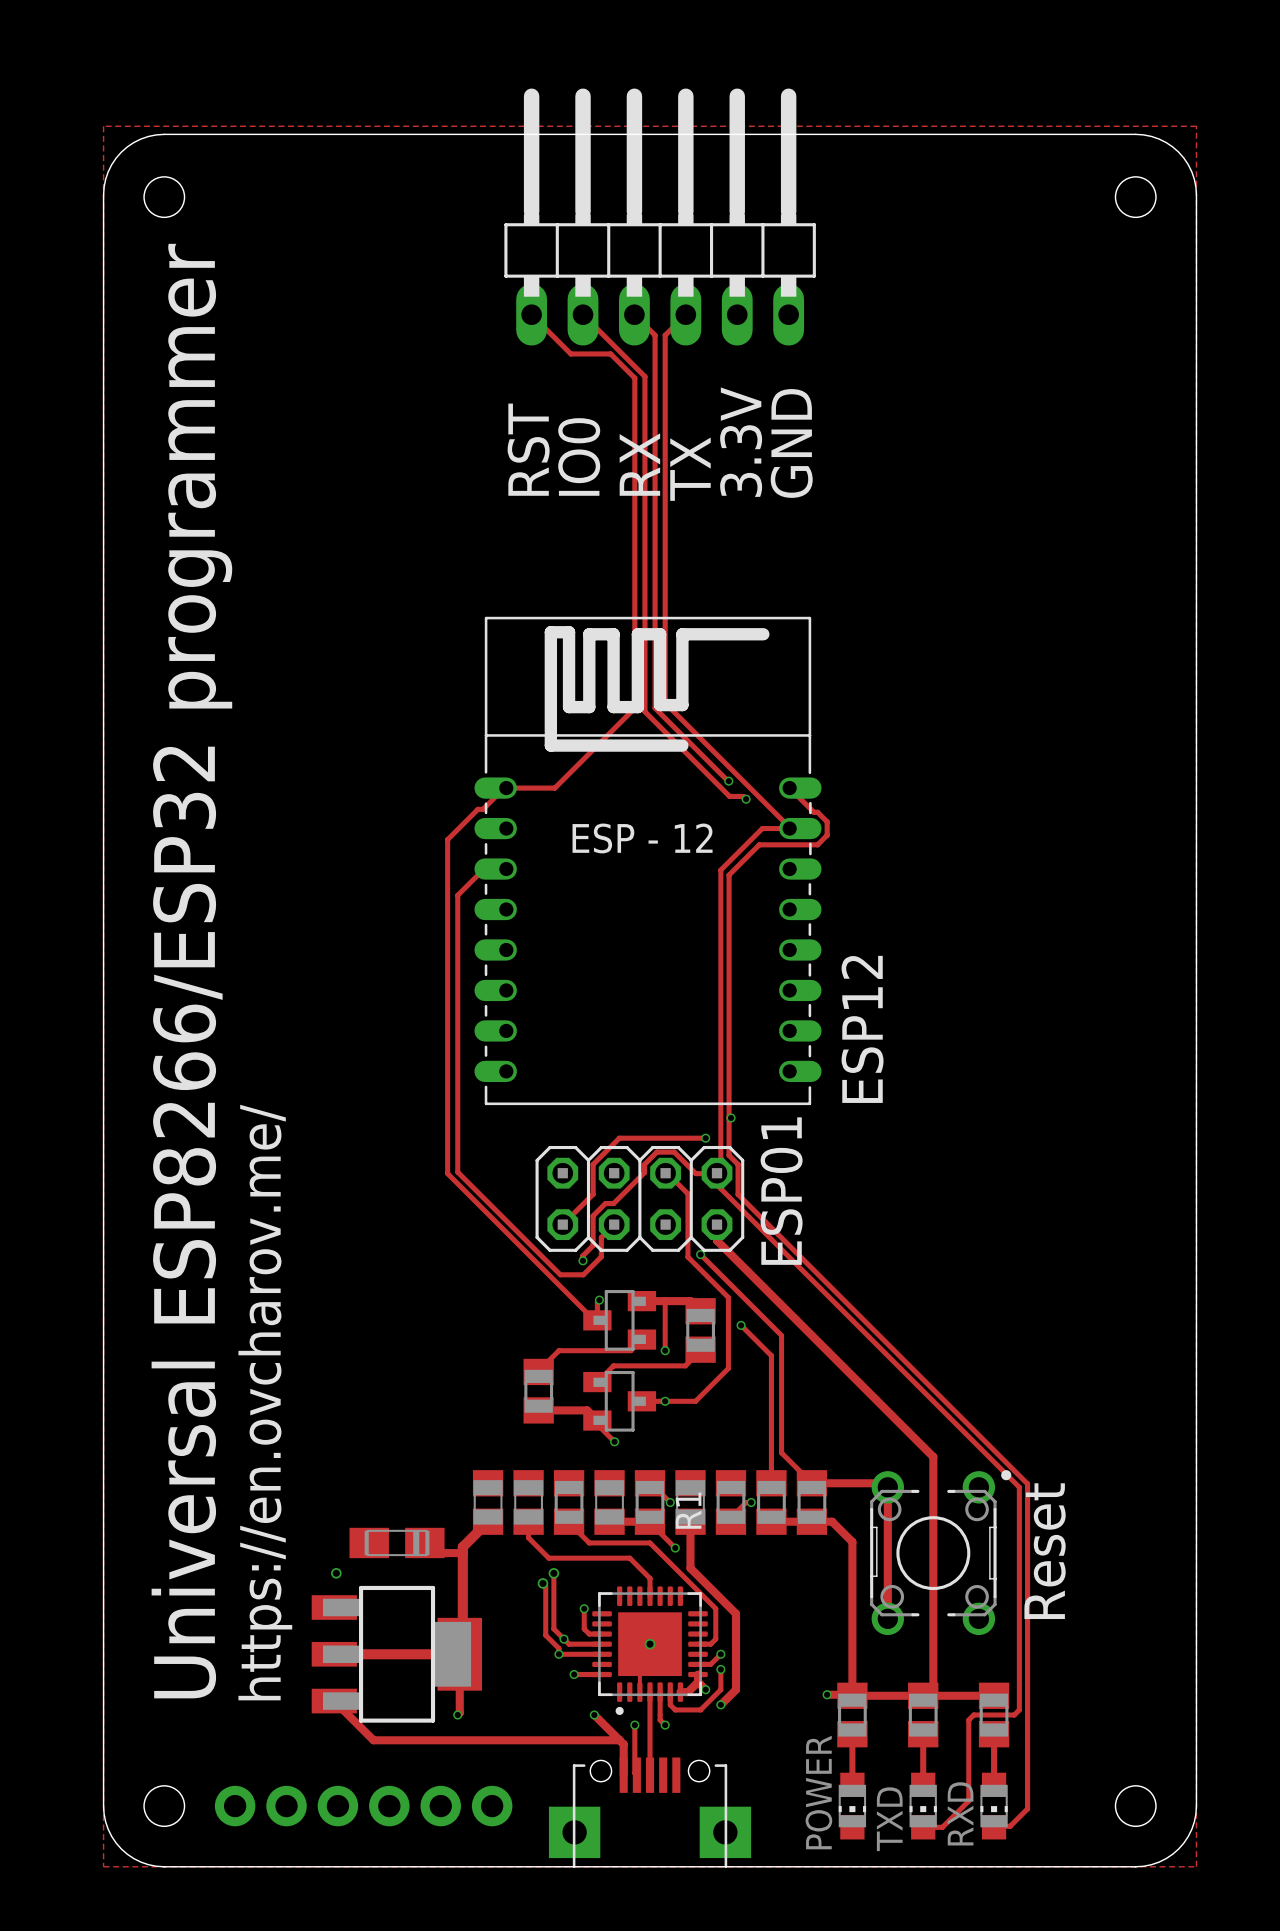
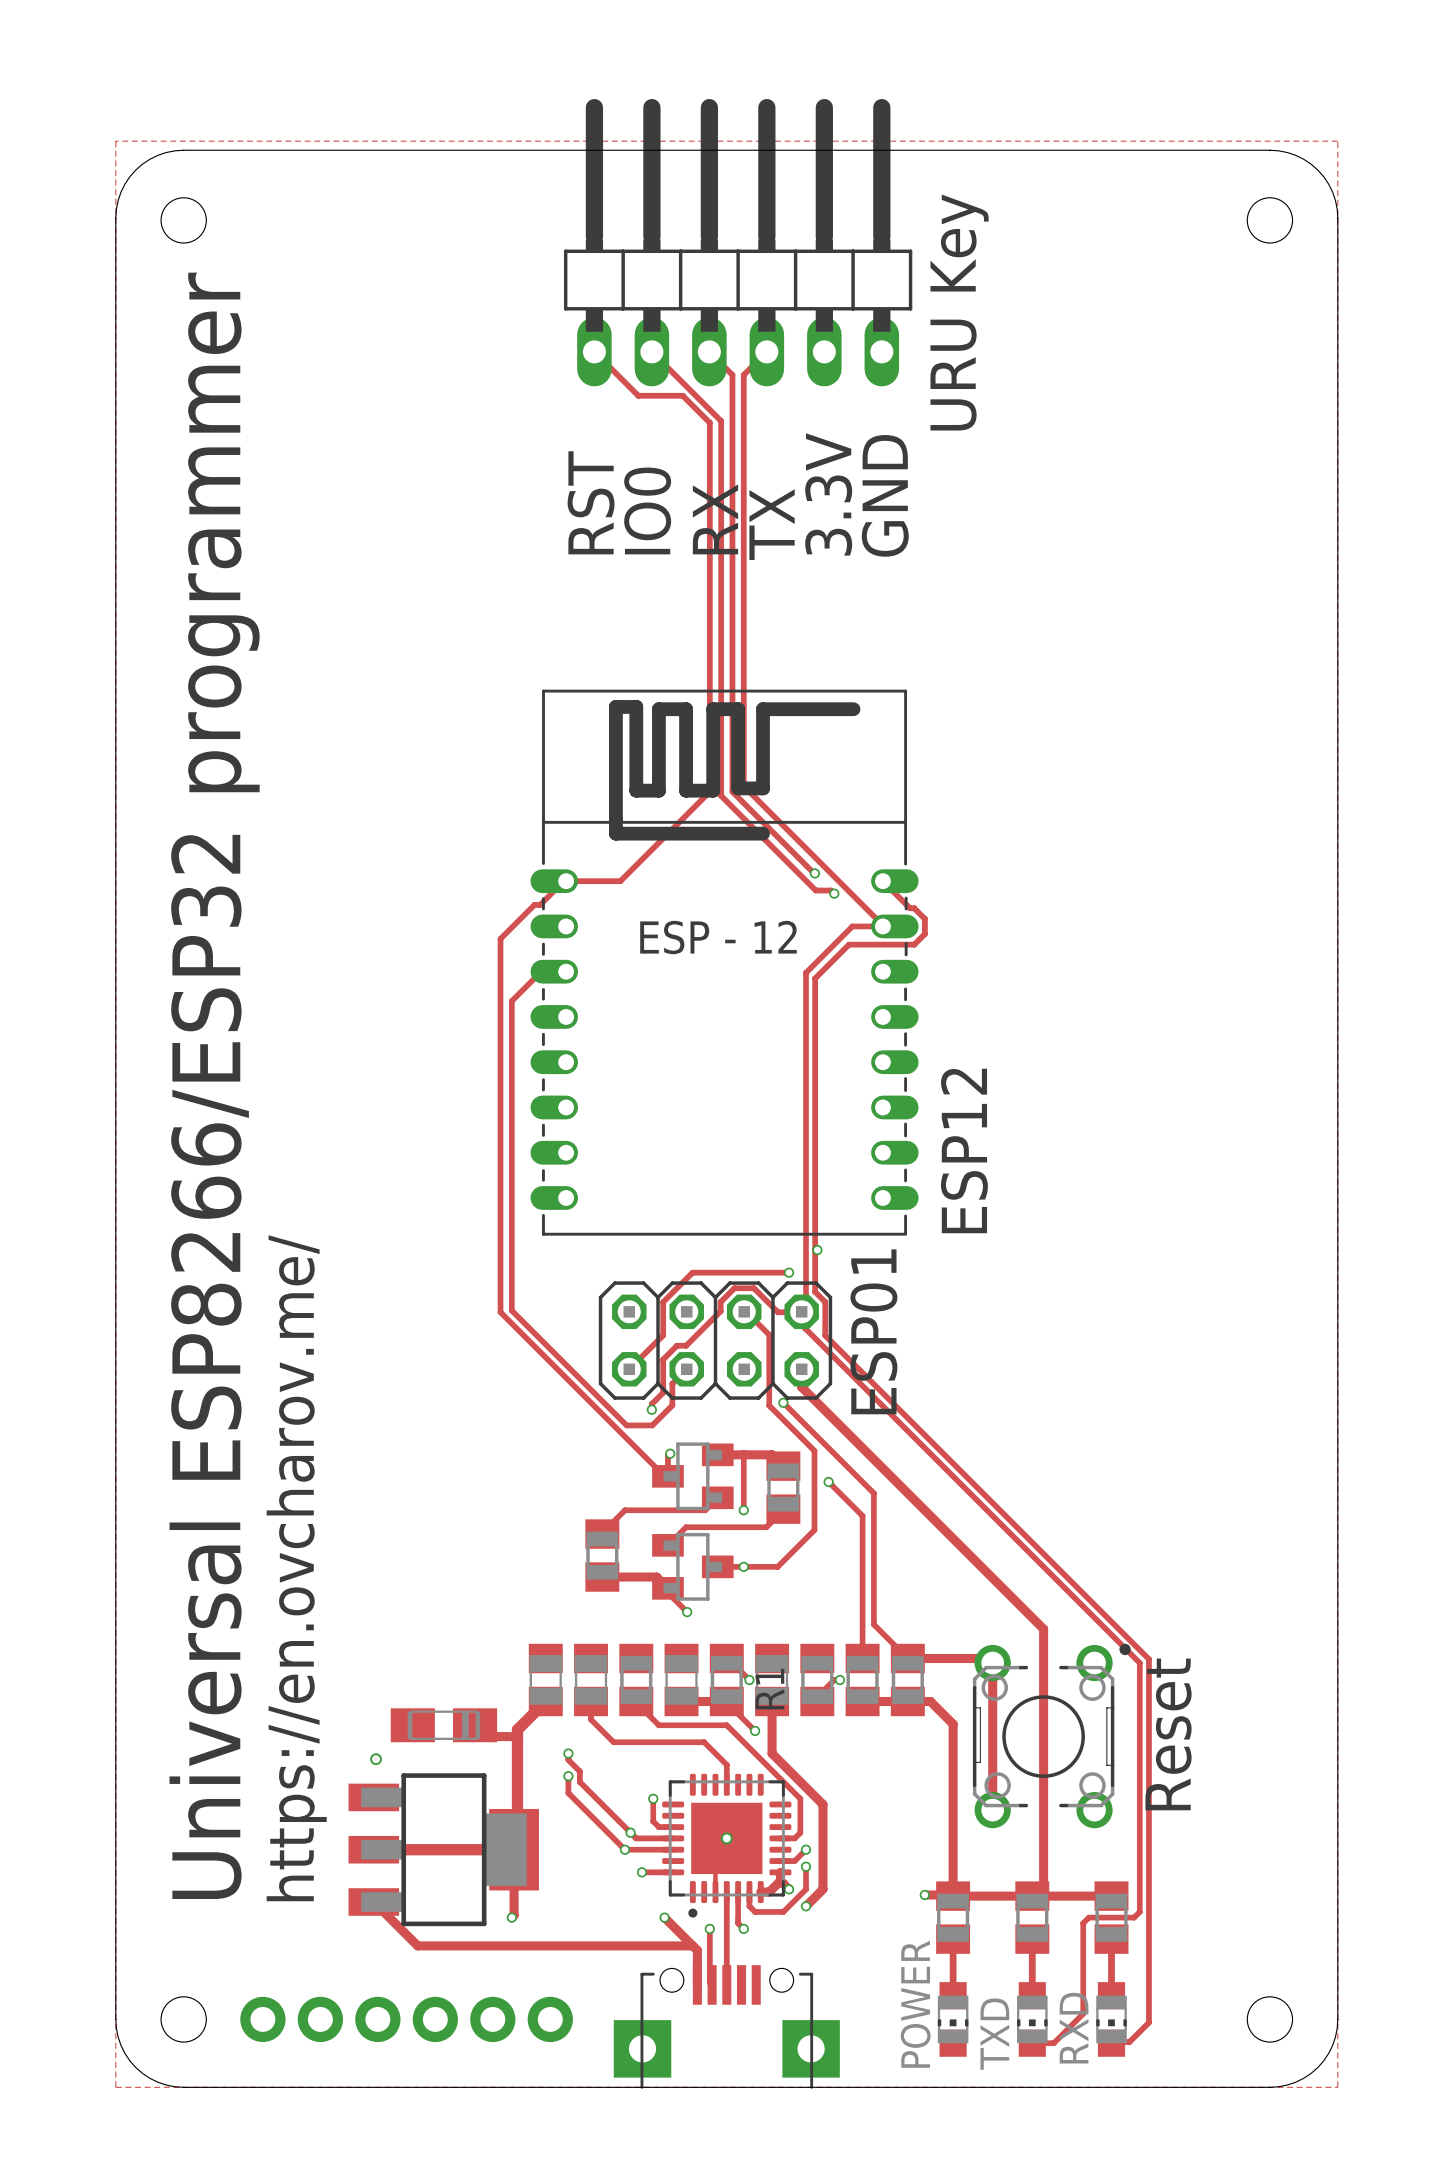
text: none -> URU Key (959, 312)
via: none -> (568, 1753)
track: (553, 1573) (553, 1628) -> (568, 1753) (568, 1760) (579, 1771) (579, 1781) (619, 1821)
via: (553, 1573) -> none
track: (542, 1583) (545, 1586) (545, 1635) (558, 1648) (558, 1654) -> (568, 1776) (568, 1793) (624, 1849)
via: (542, 1583) -> none
via: none -> (568, 1776)

